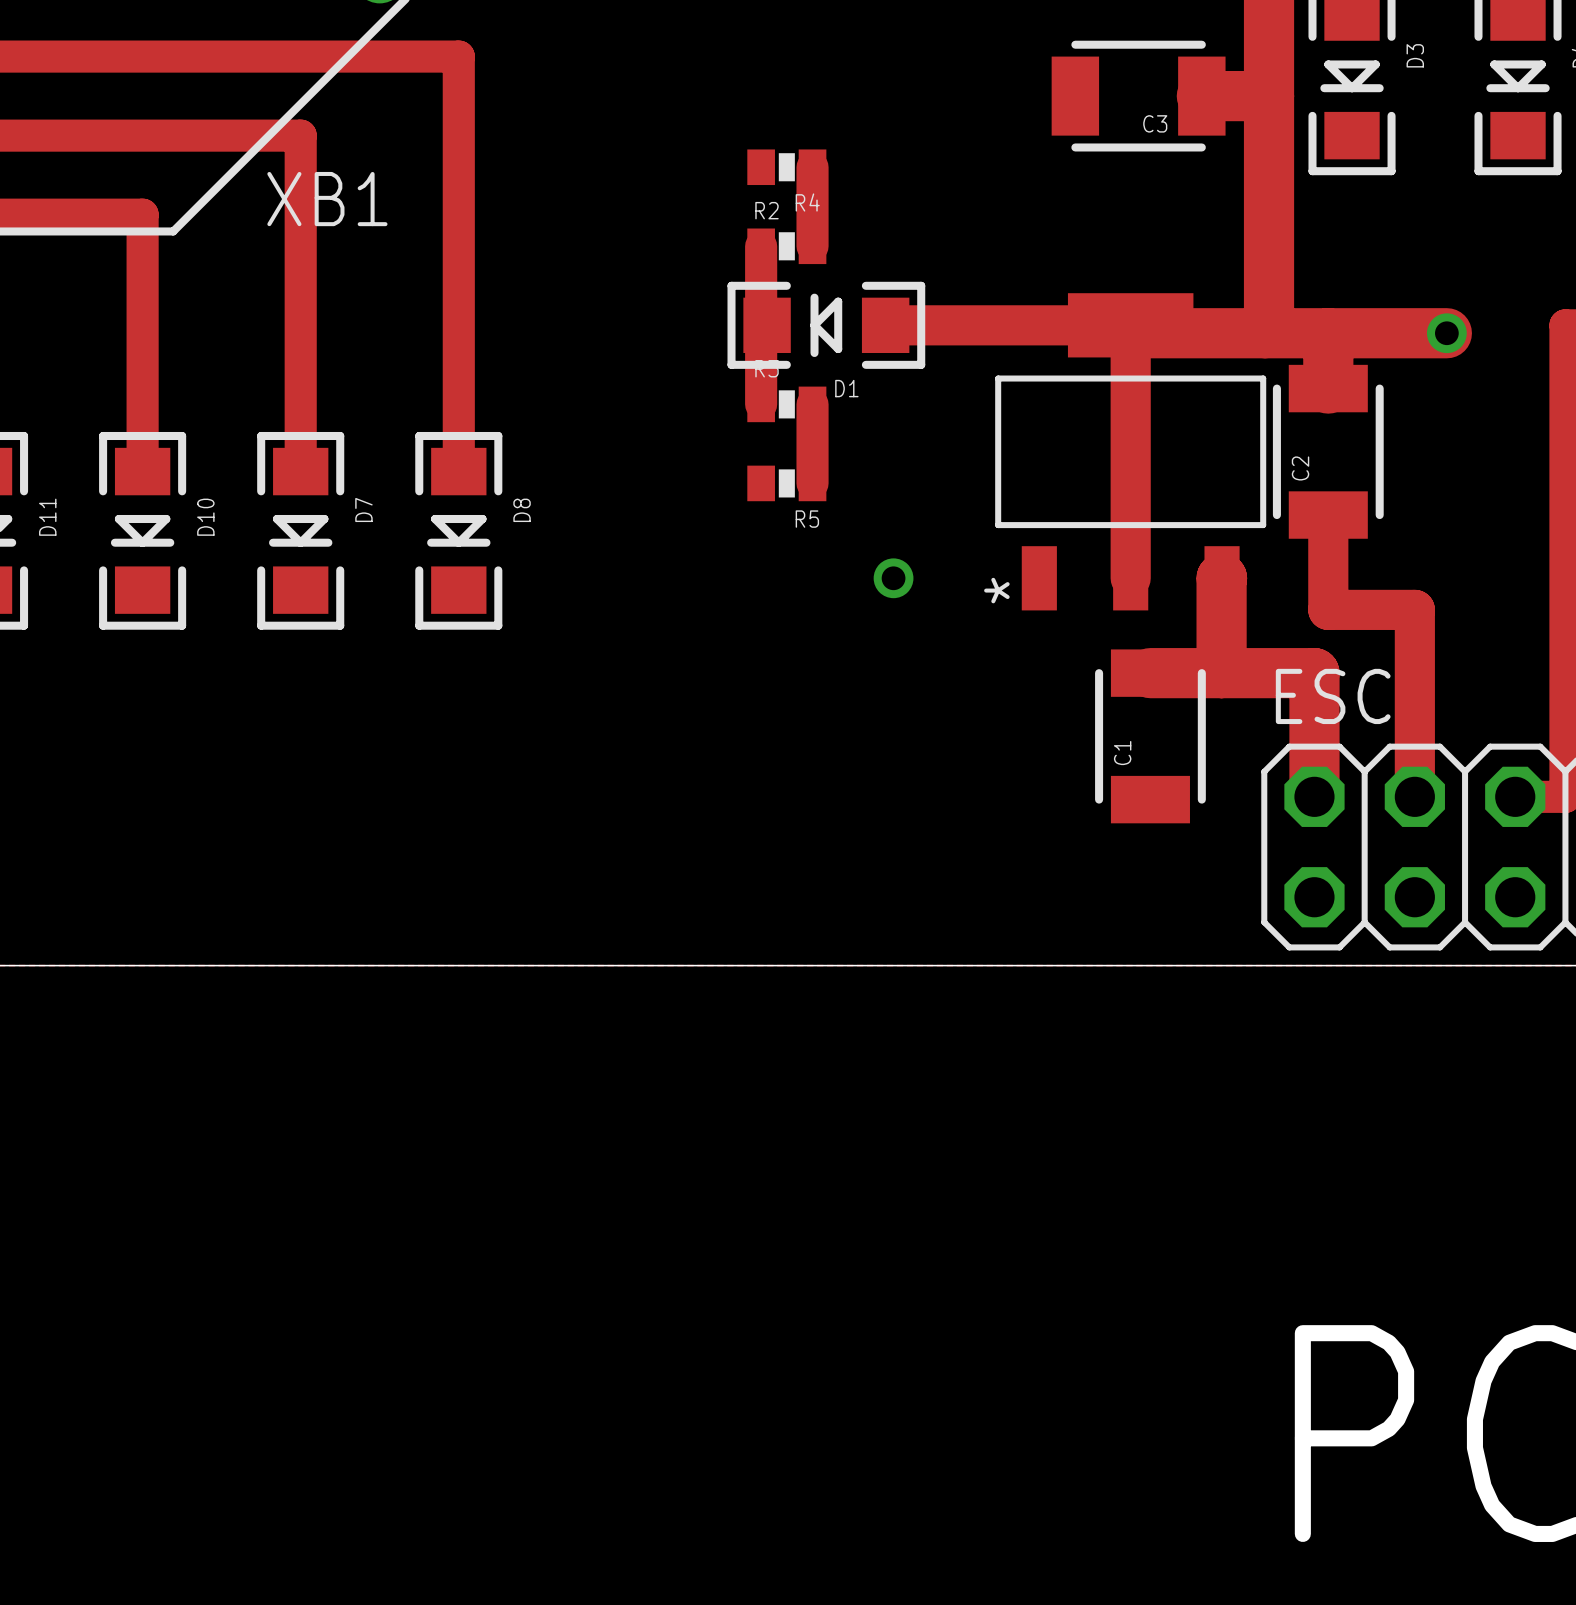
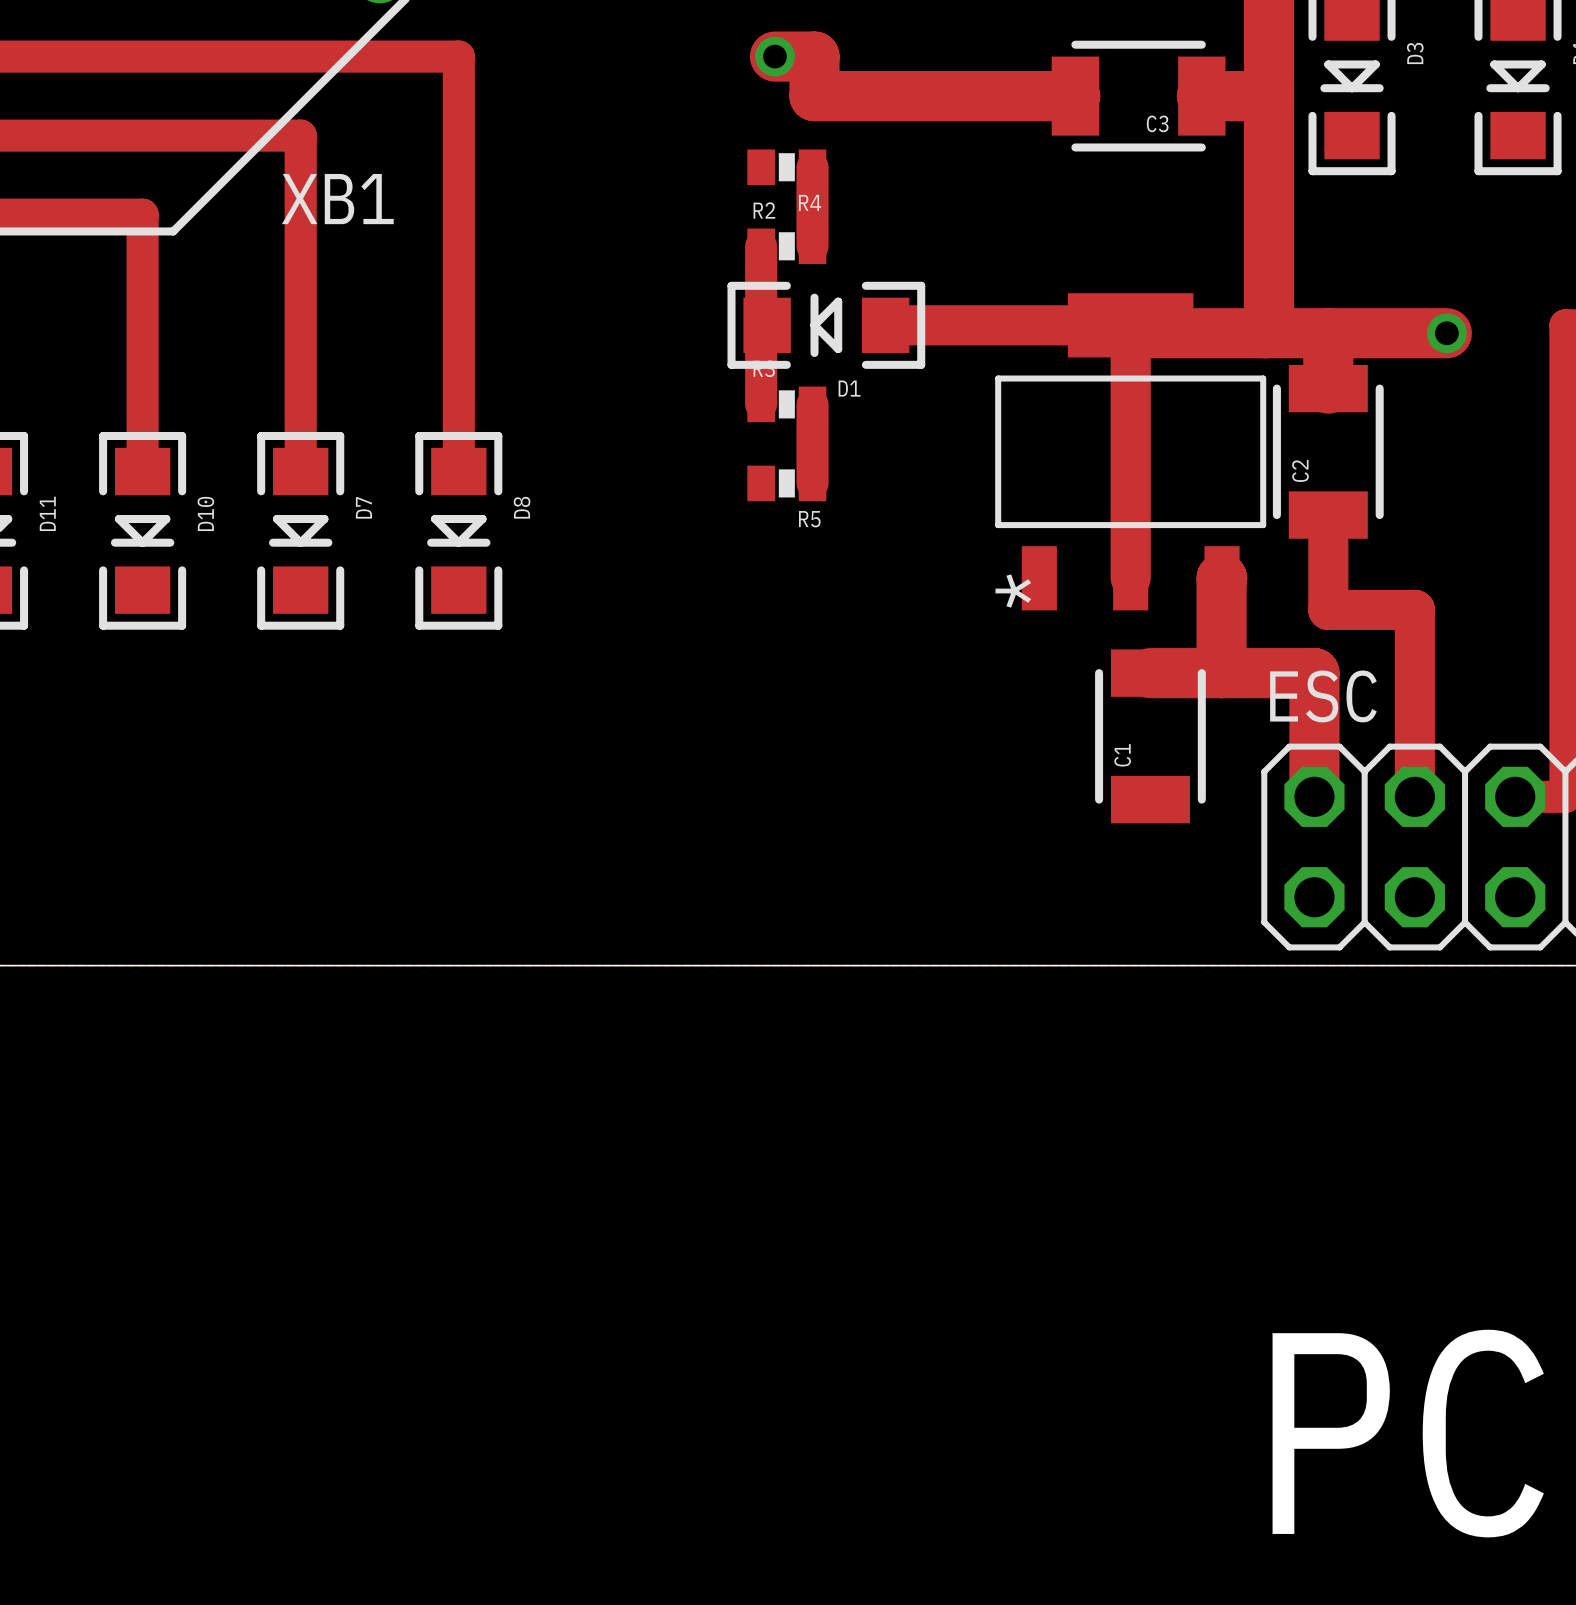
track: none -> (774, 56) (814, 56) (814, 96) (1075, 96)
via: none -> (774, 56)
via: (893, 578) -> none

